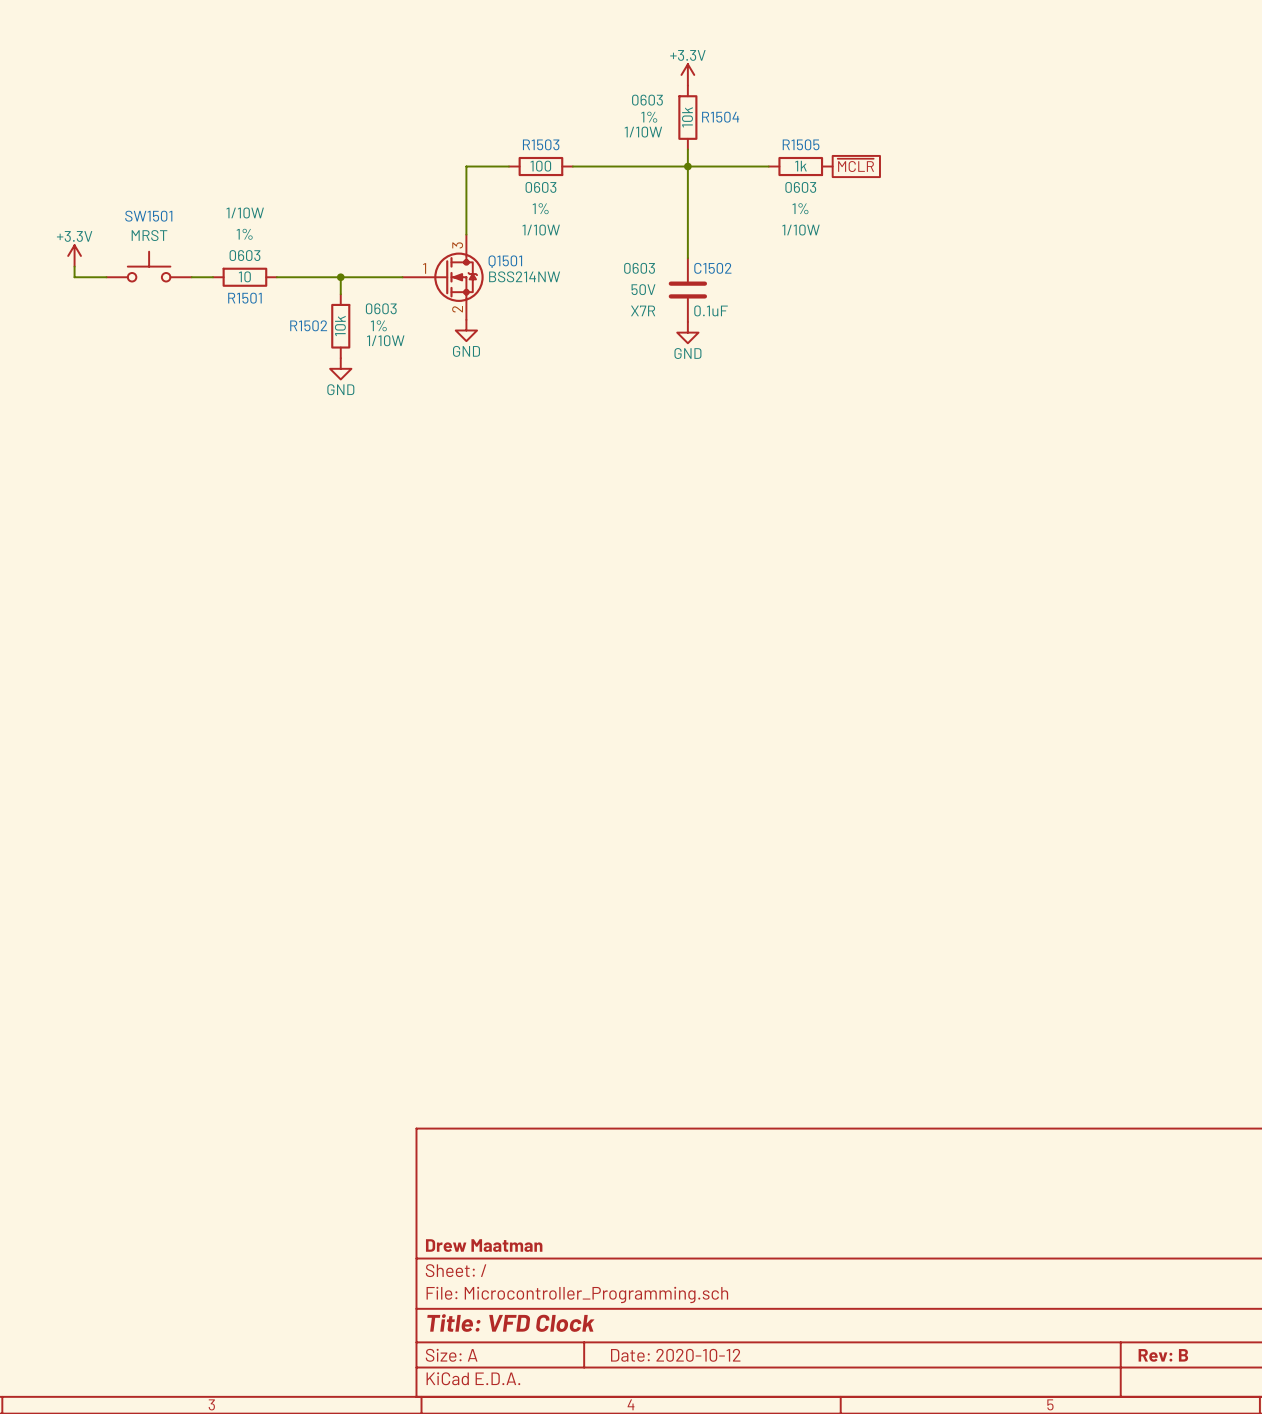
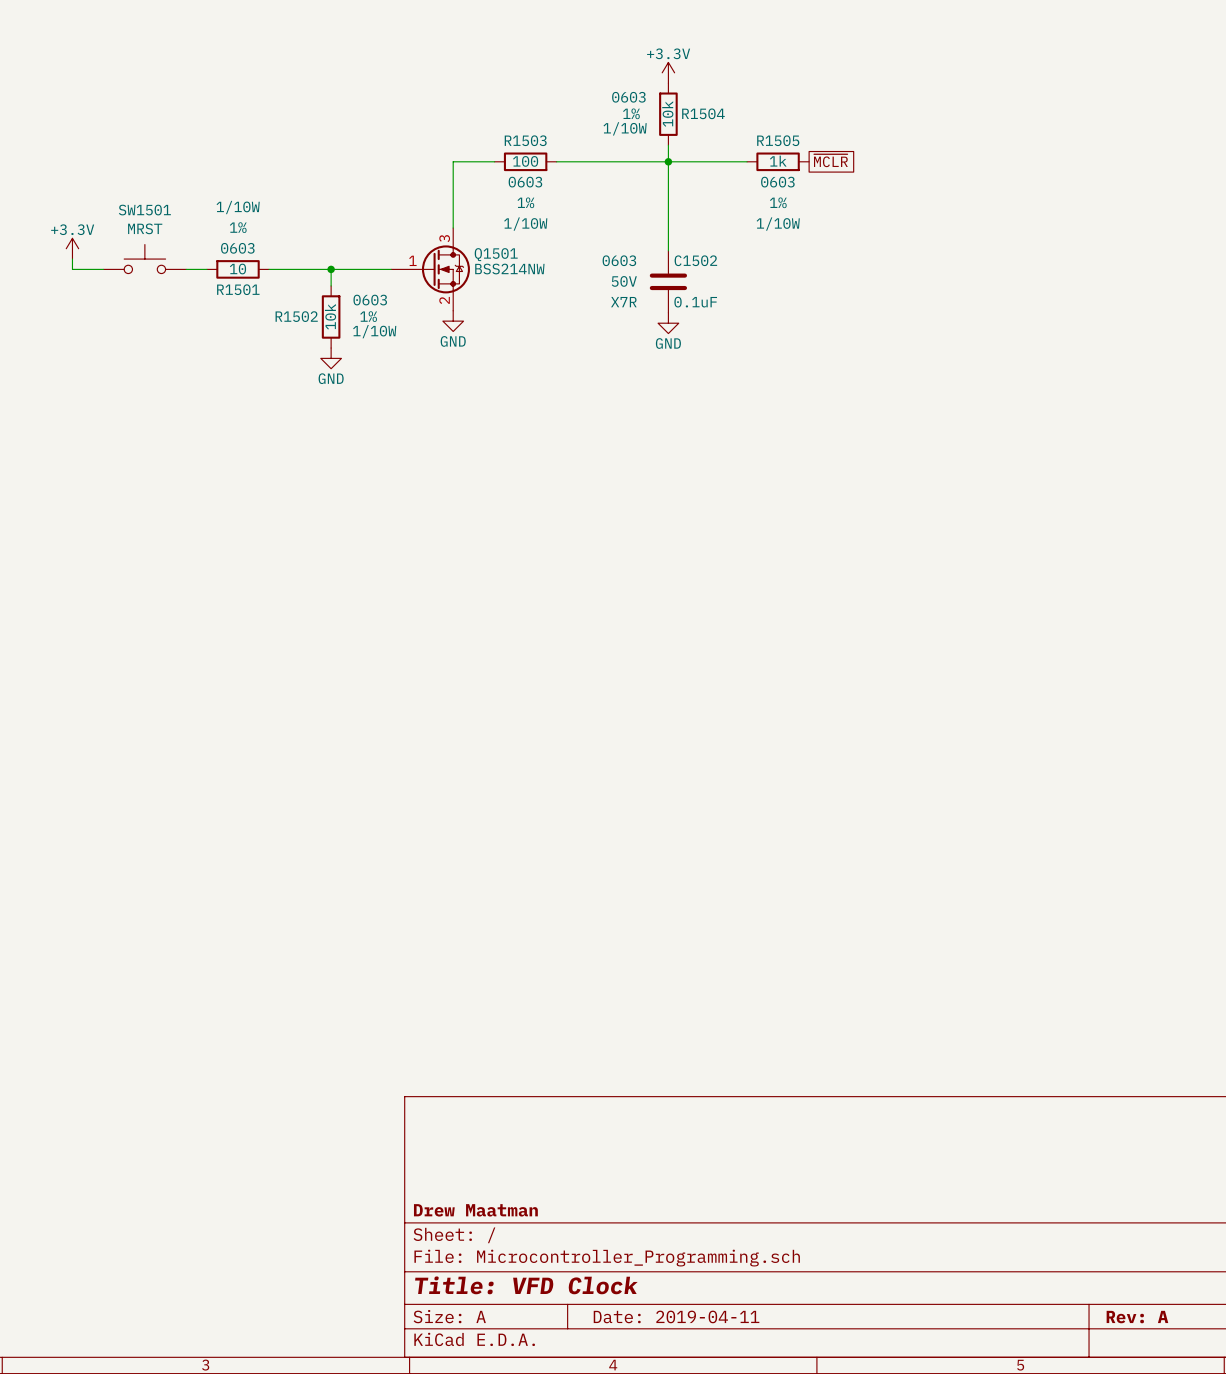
title block: Date: 2020-10-12 (675, 1355) -> Date: 2019-04-11 (676, 1316)
title block: Rev: B (1163, 1355) -> Rev: A (1137, 1317)

